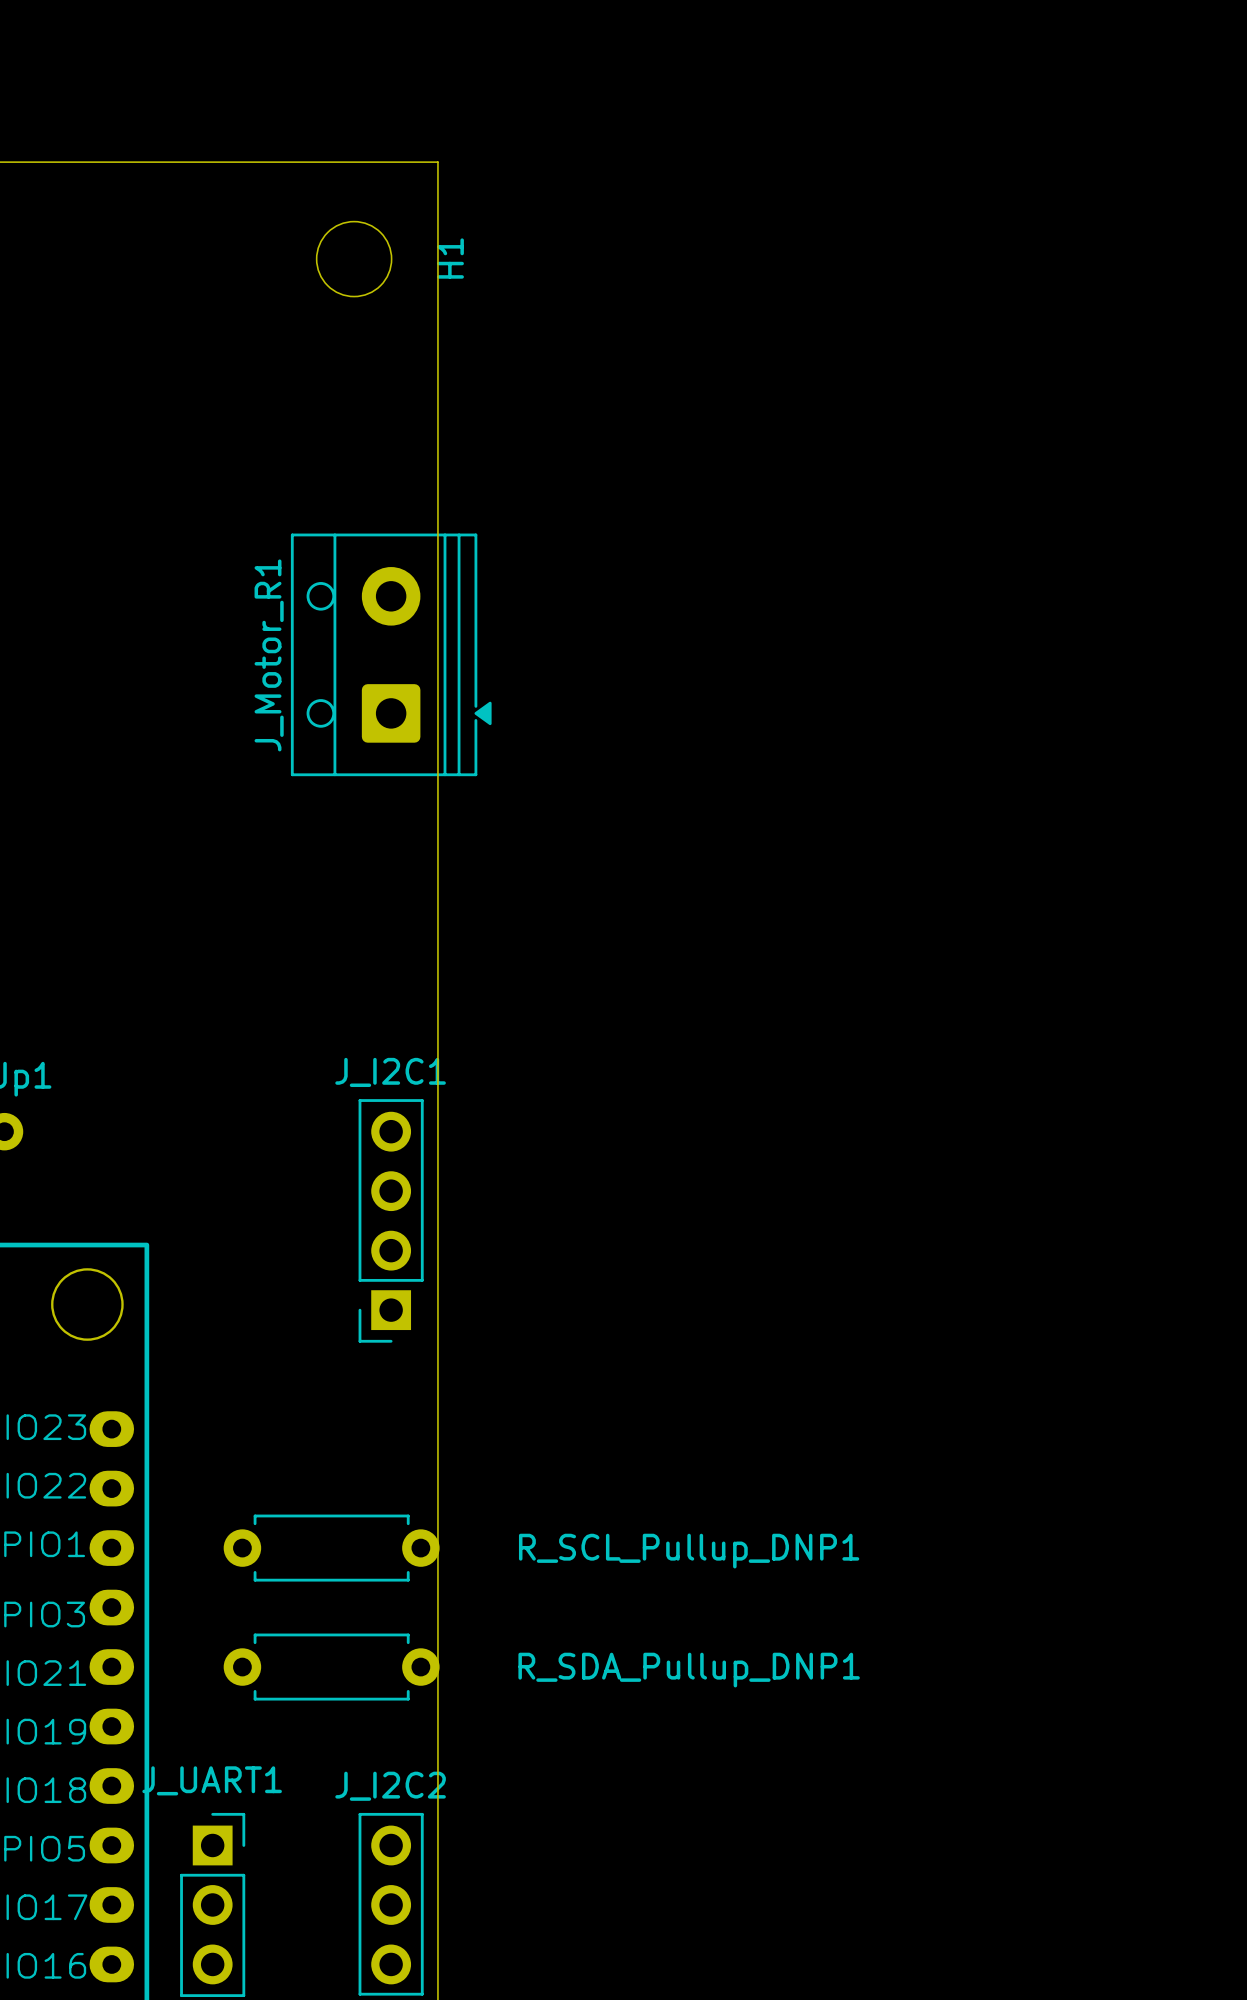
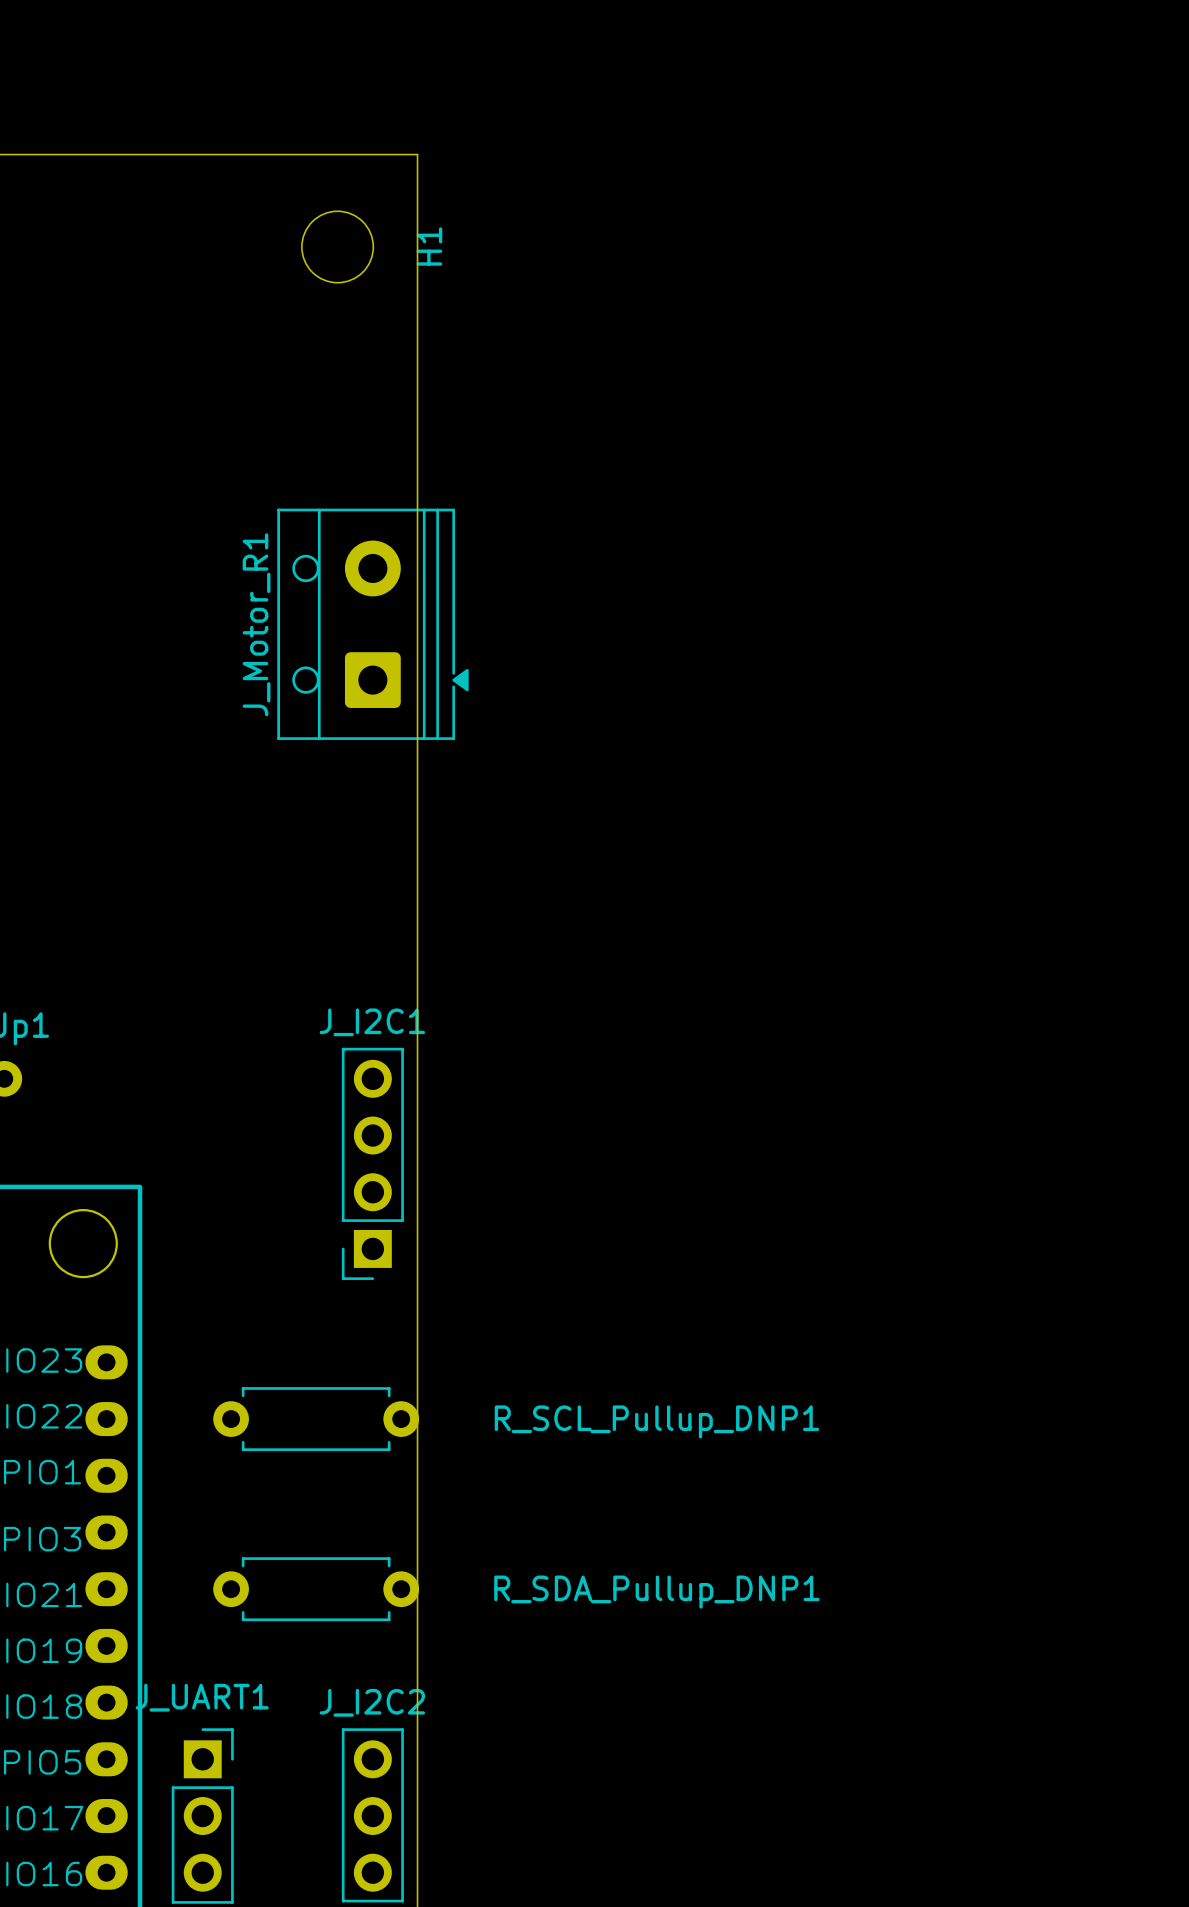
R_SCL_Pullup_DNP1 position: (331, 1548) -> (316, 1419)

